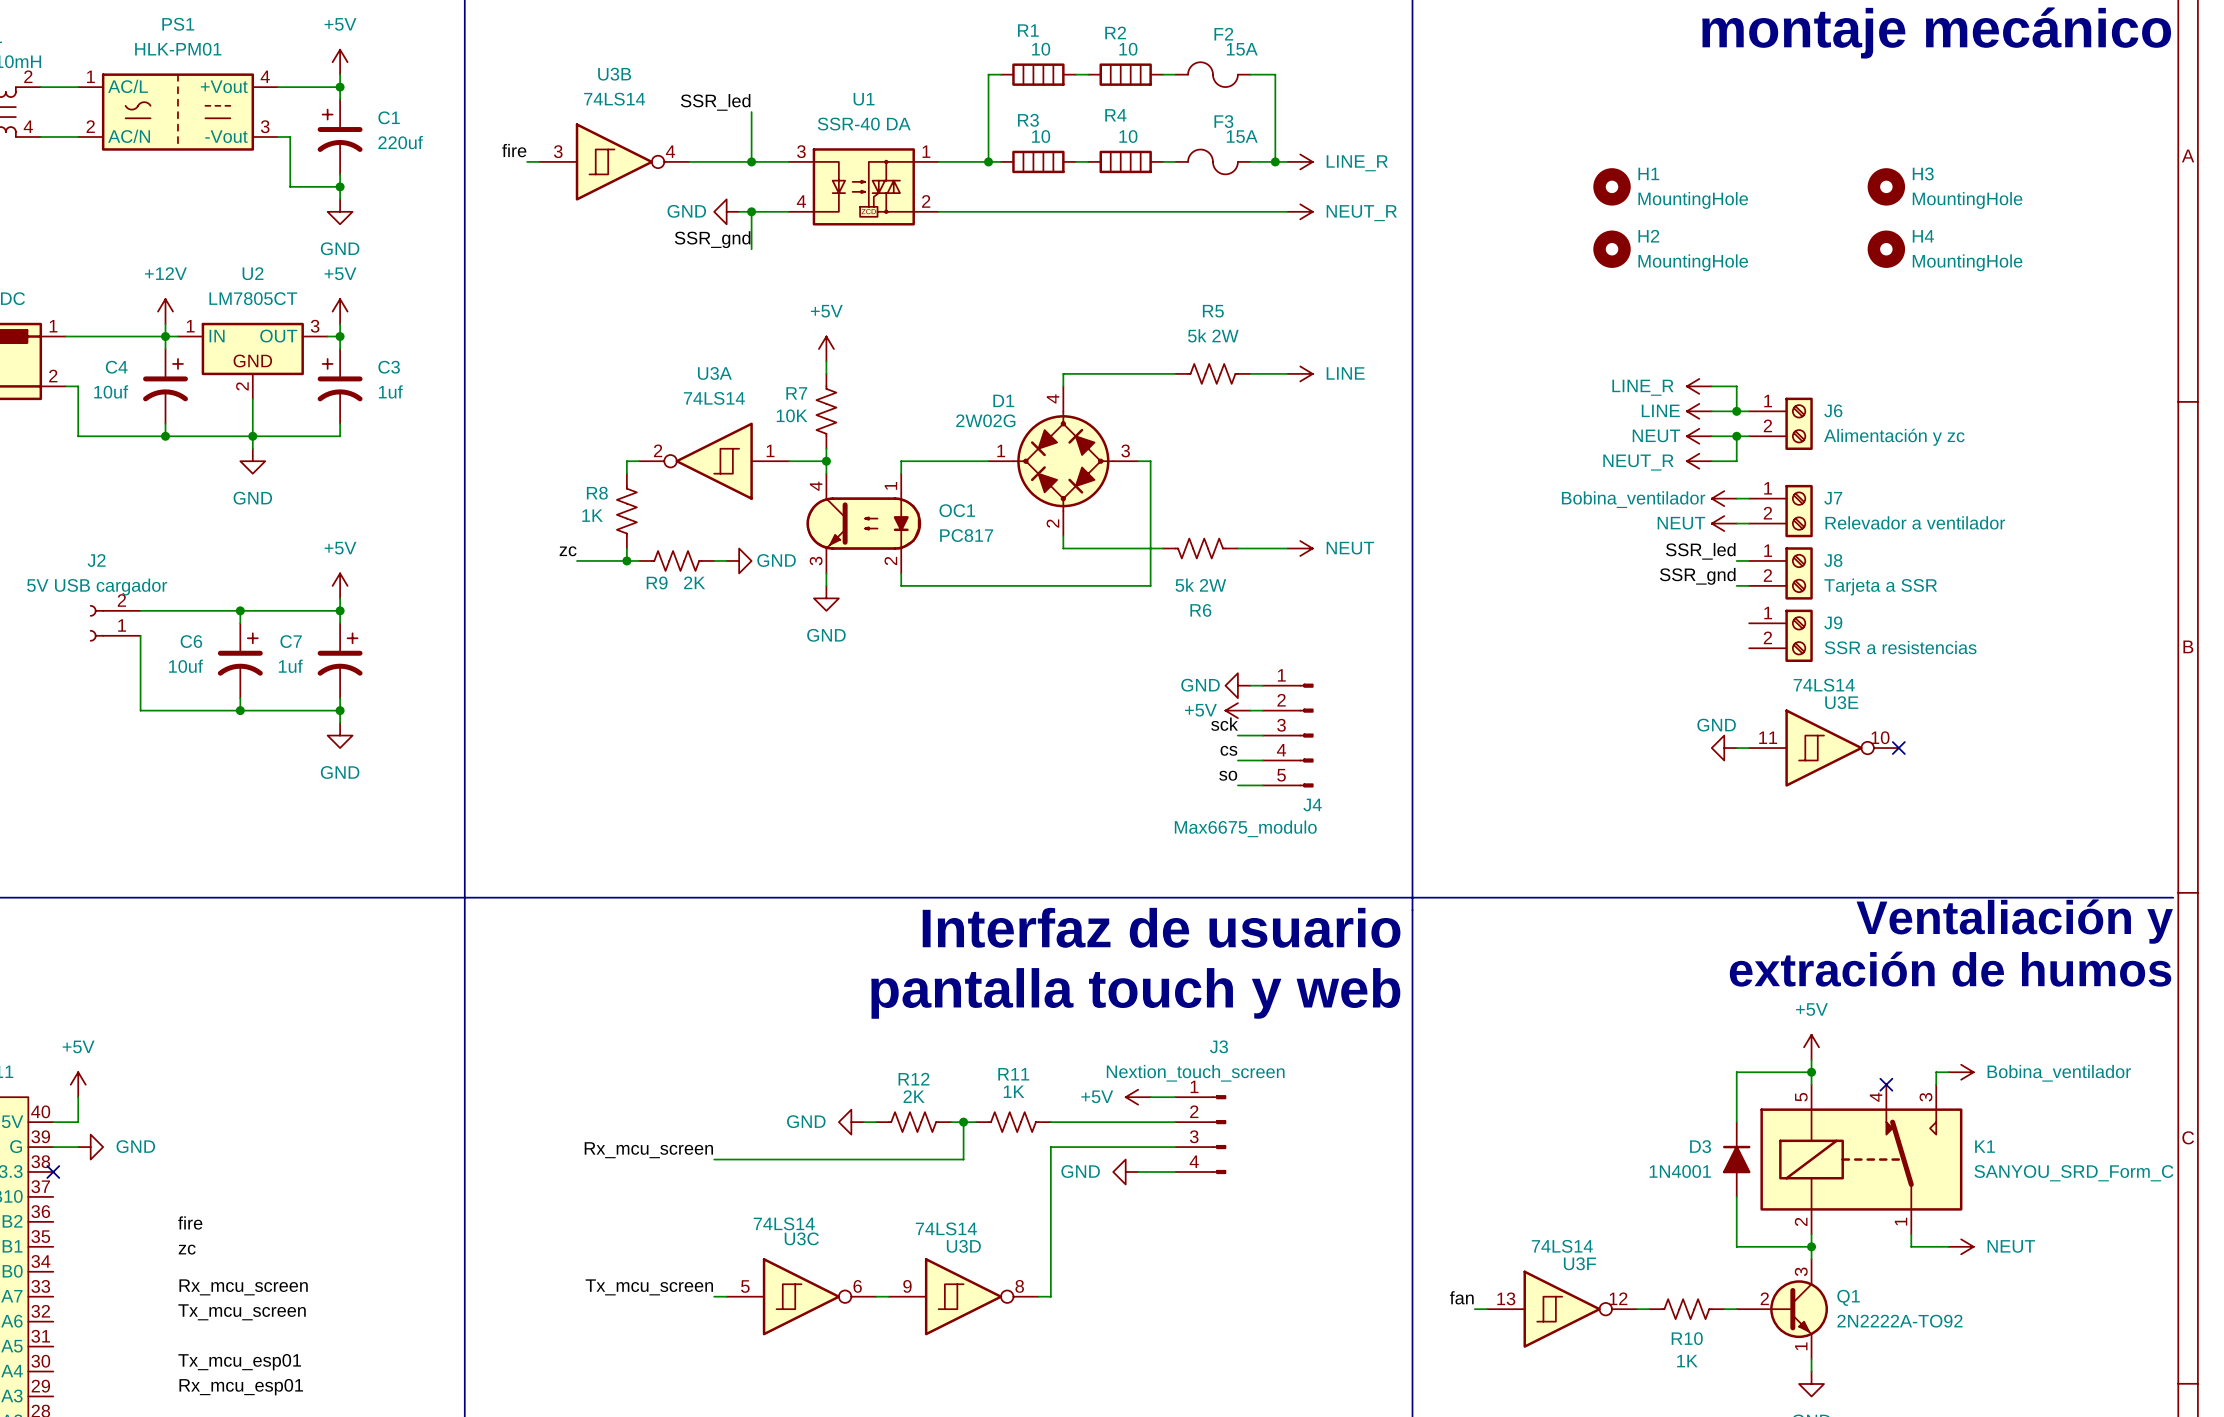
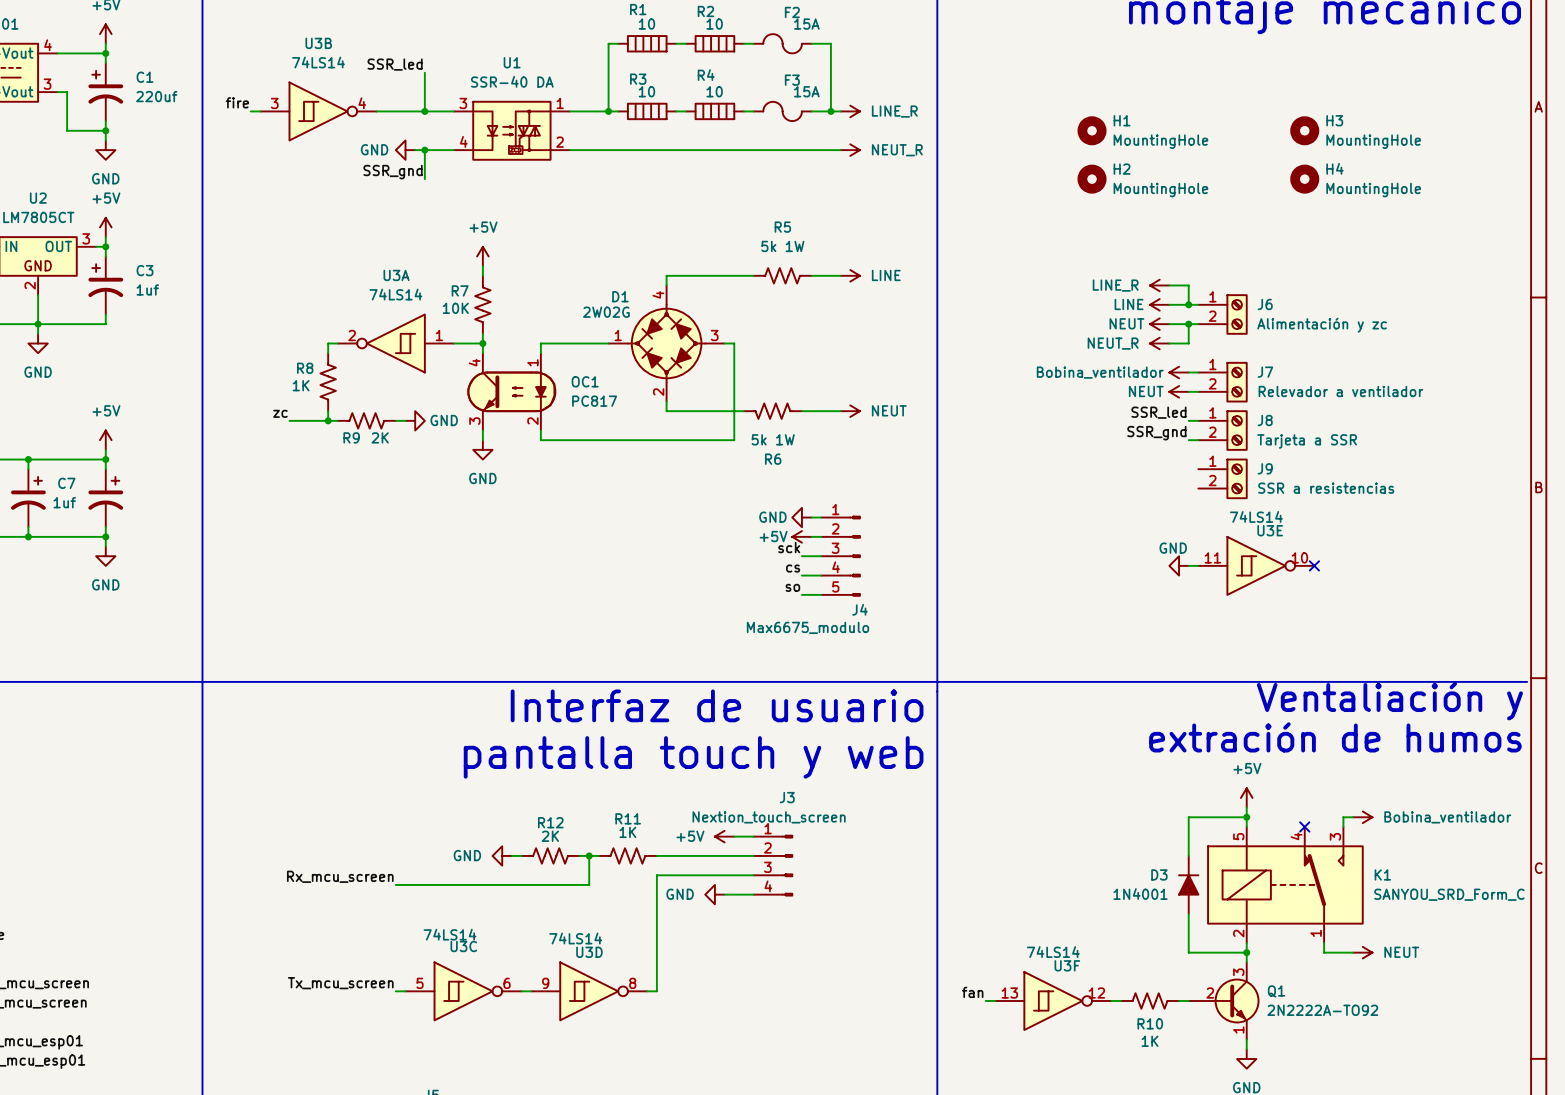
R5 value: 5k 2W (1213, 335) -> 5k 1W (782, 246)
R6 value: 5k 2W (1200, 585) -> 5k 1W (773, 439)

